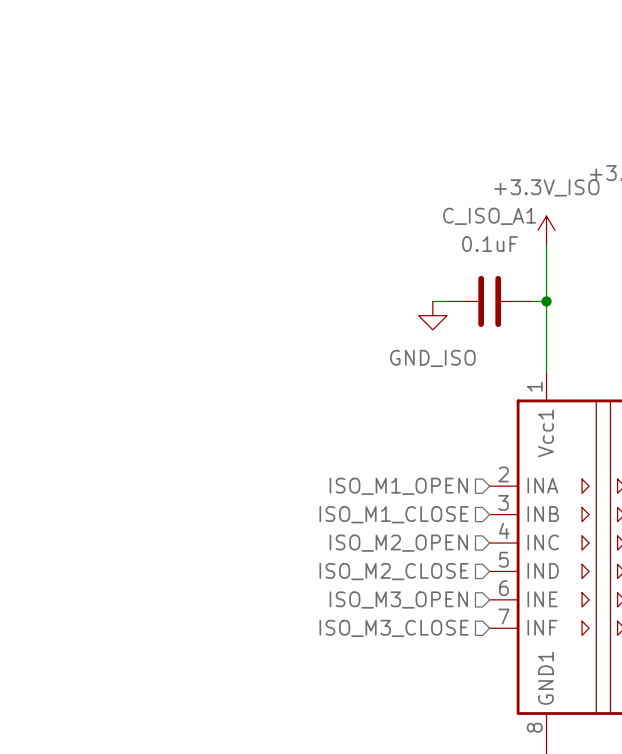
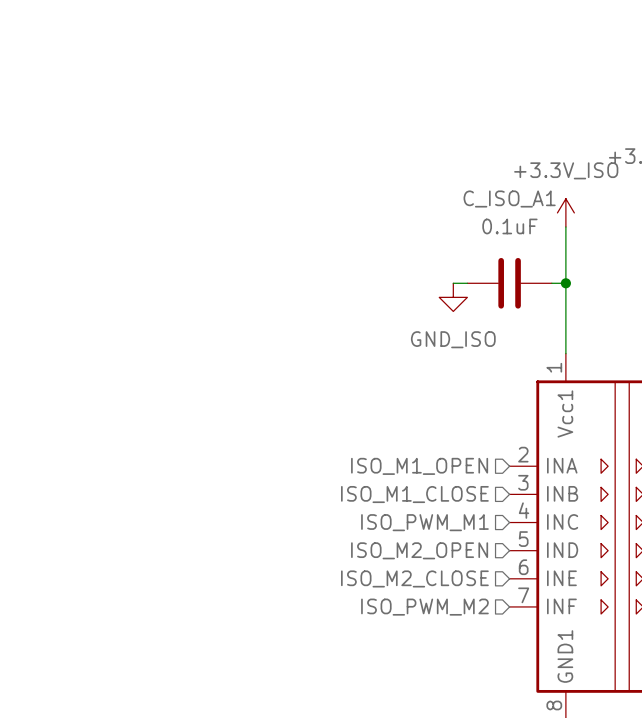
hierarchical label: ISO_M2_OPEN (398, 543) -> ISO_PWM_M1 (424, 522)
hierarchical label: ISO_M2_CLOSE (394, 571) -> ISO_M2_OPEN (419, 550)
hierarchical label: ISO_M3_OPEN (398, 599) -> ISO_M2_CLOSE (414, 578)
hierarchical label: ISO_M3_CLOSE (394, 628) -> ISO_PWM_M2 (424, 607)

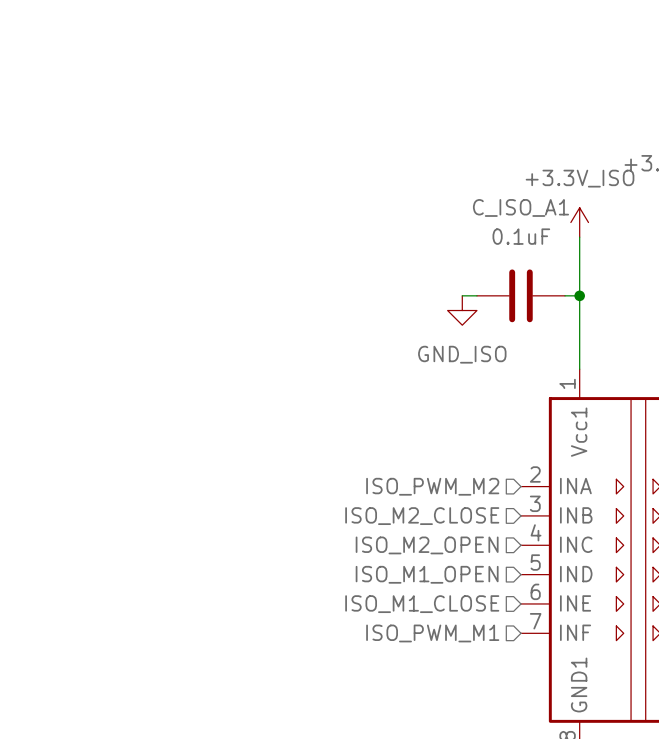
hierarchical label: ISO_M1_OPEN (419, 466) -> ISO_PWM_M2 (432, 486)
hierarchical label: ISO_M1_CLOSE (414, 494) -> ISO_M2_CLOSE (422, 516)
hierarchical label: ISO_PWM_M1 (424, 522) -> ISO_M2_OPEN (427, 545)
hierarchical label: ISO_M2_OPEN (419, 550) -> ISO_M1_OPEN (427, 574)
hierarchical label: ISO_M2_CLOSE (414, 578) -> ISO_M1_CLOSE (422, 604)
hierarchical label: ISO_PWM_M2 (424, 607) -> ISO_PWM_M1 (432, 633)

